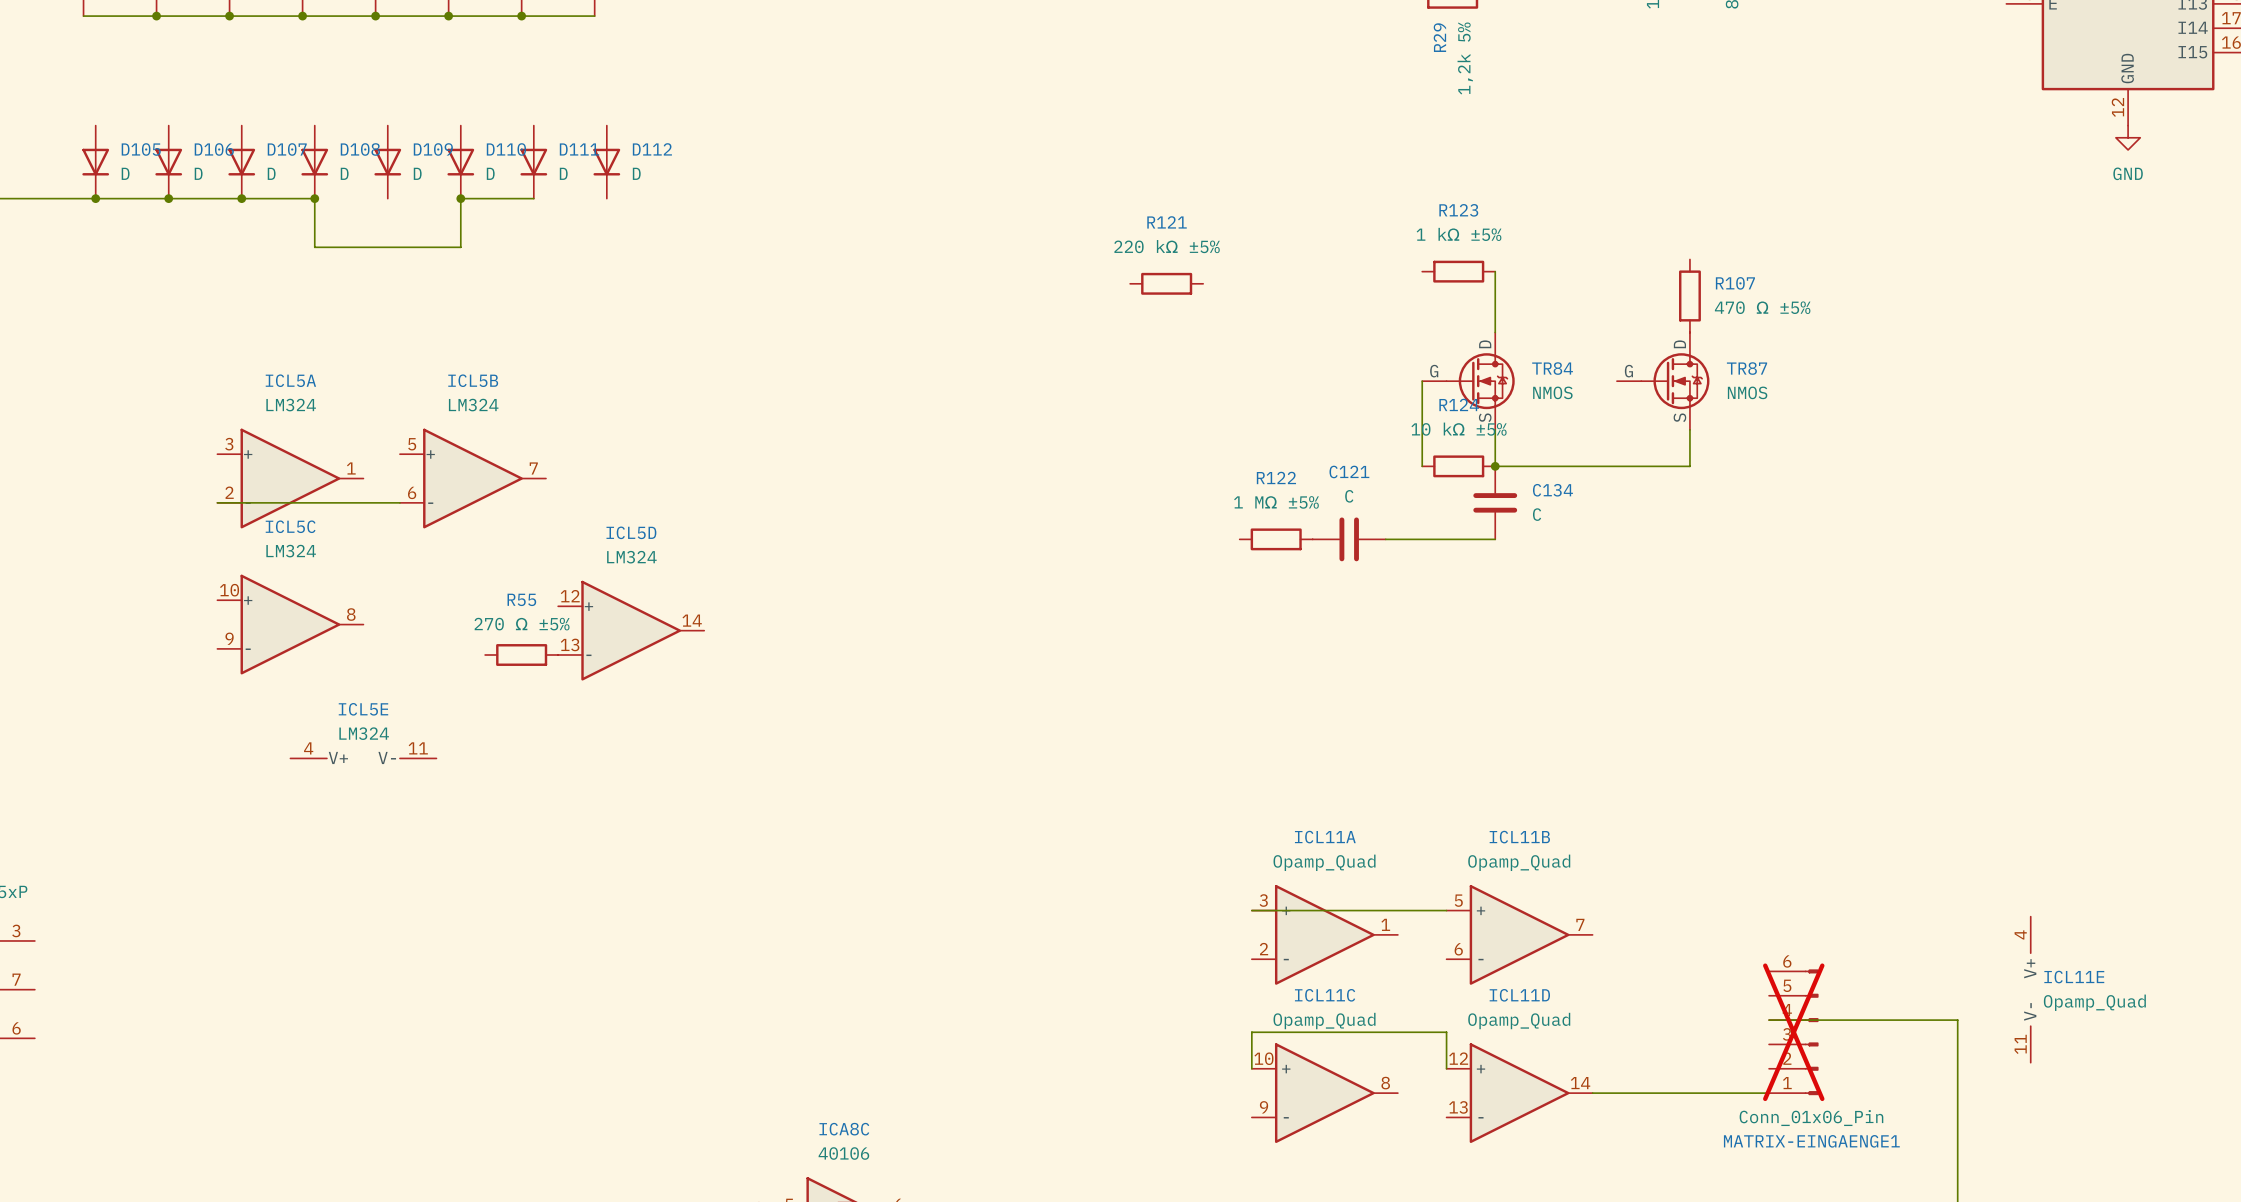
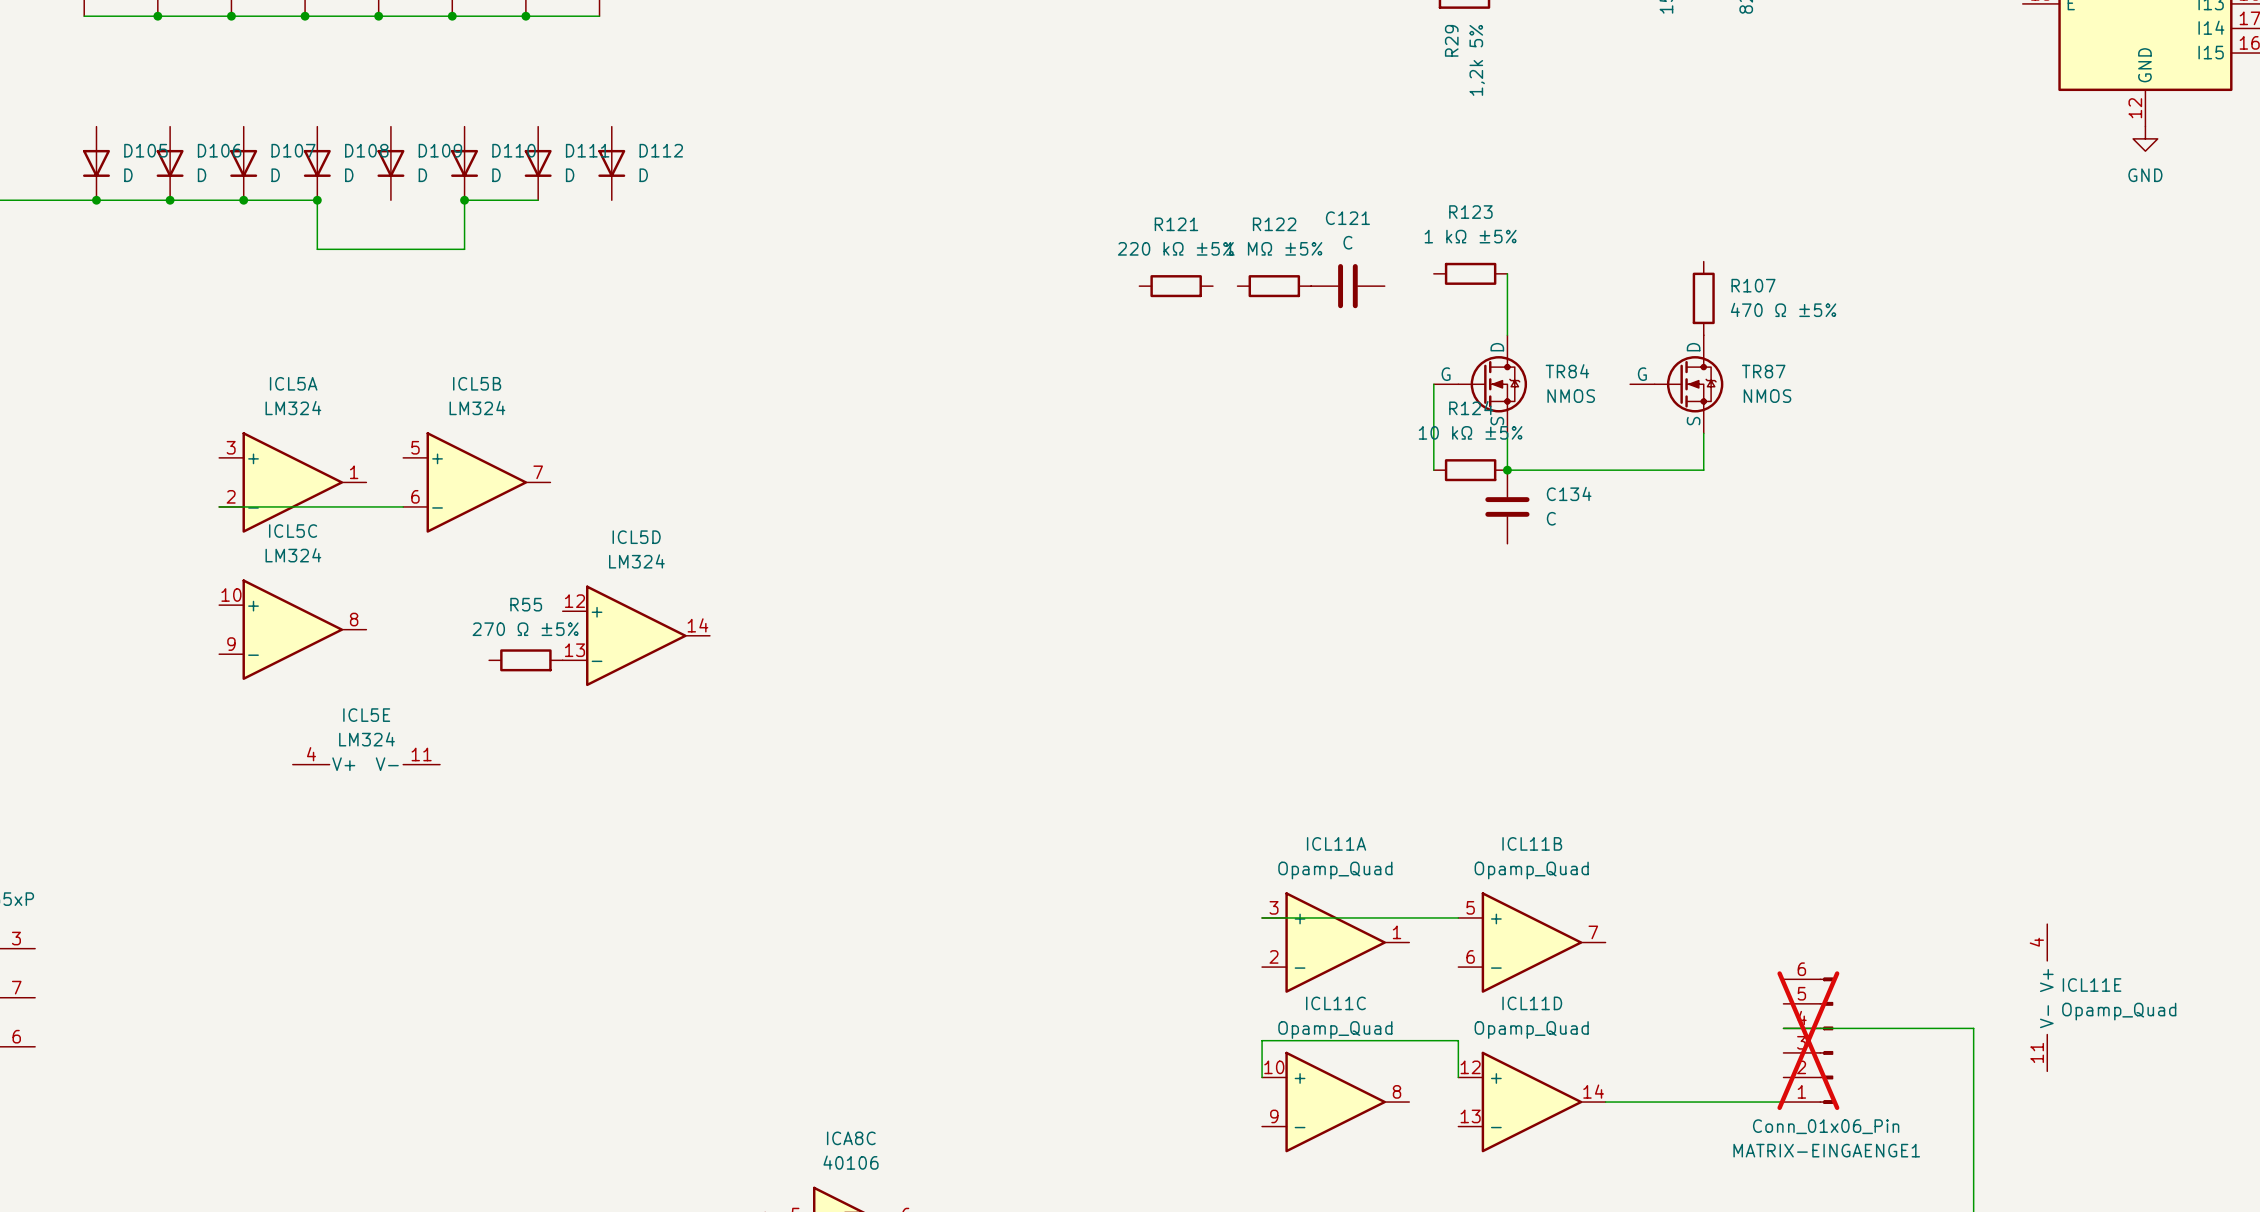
R122 position: (1276, 539) -> (1274, 286)
C121 position: (1349, 539) -> (1347, 286)
wire: (1385, 539) (1495, 539) -> none

